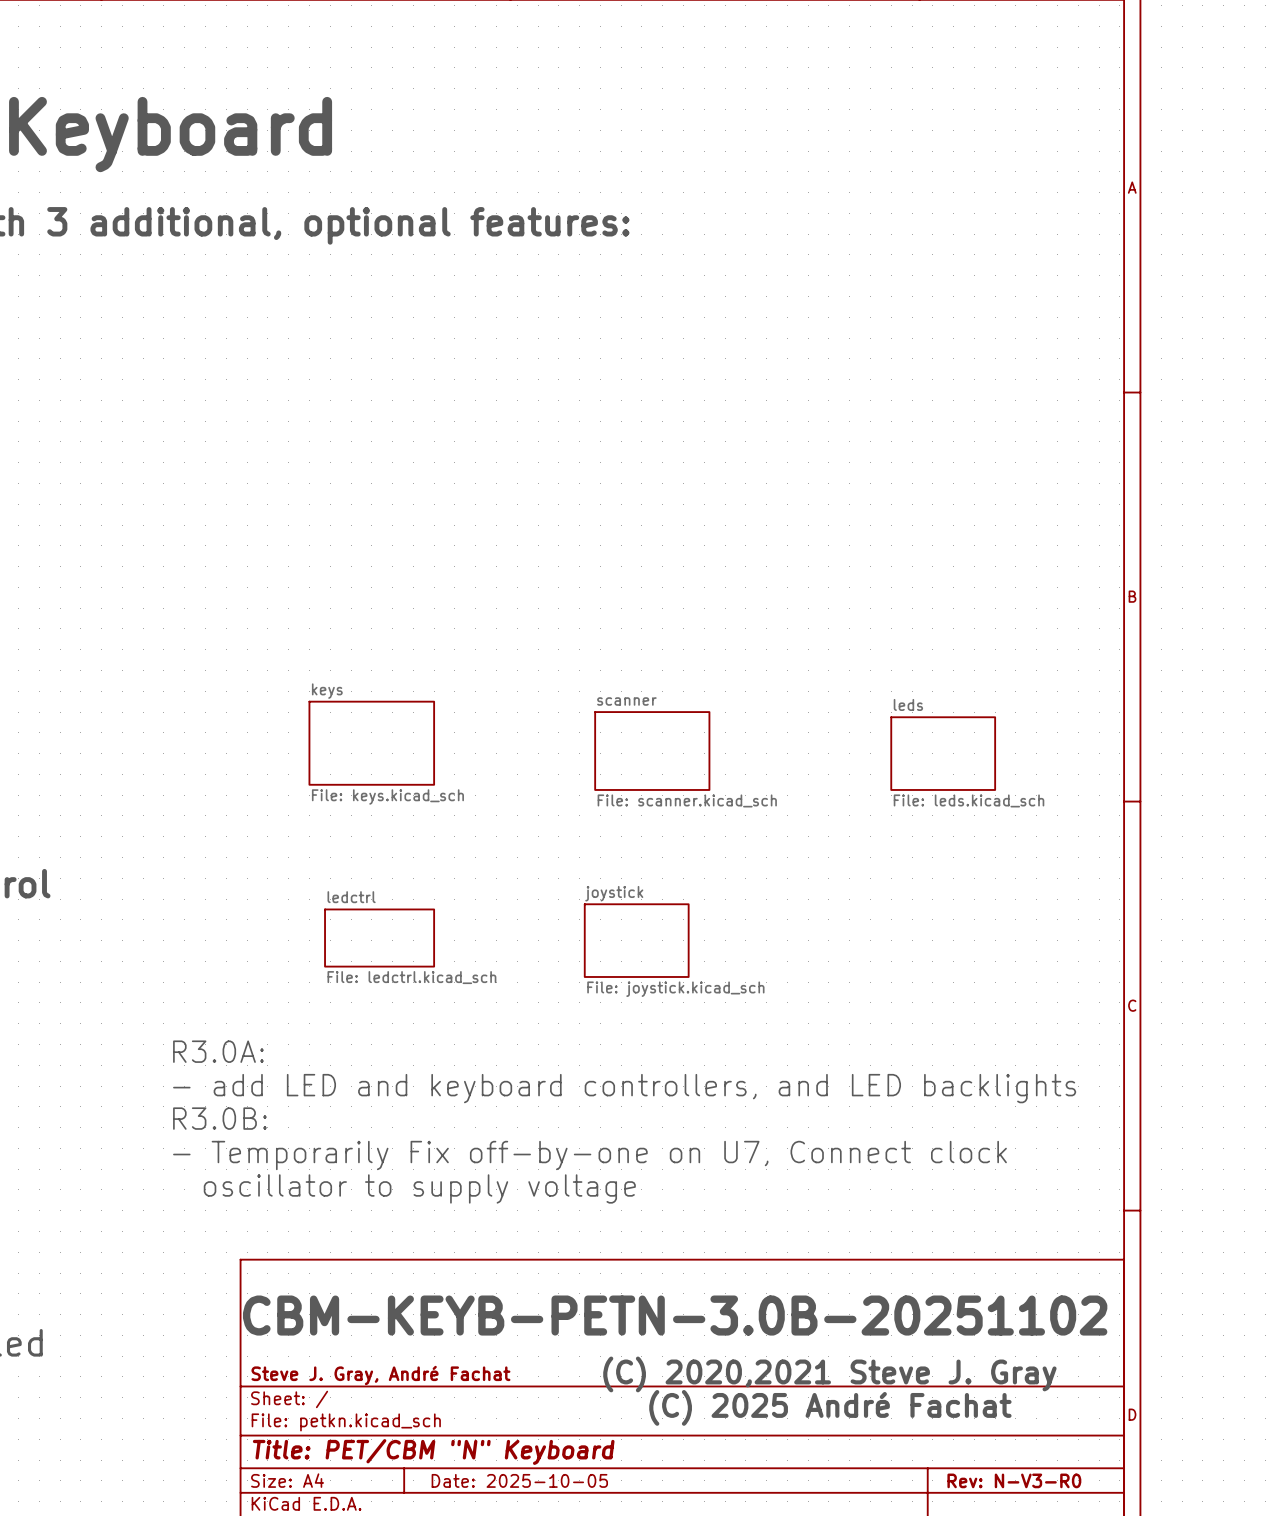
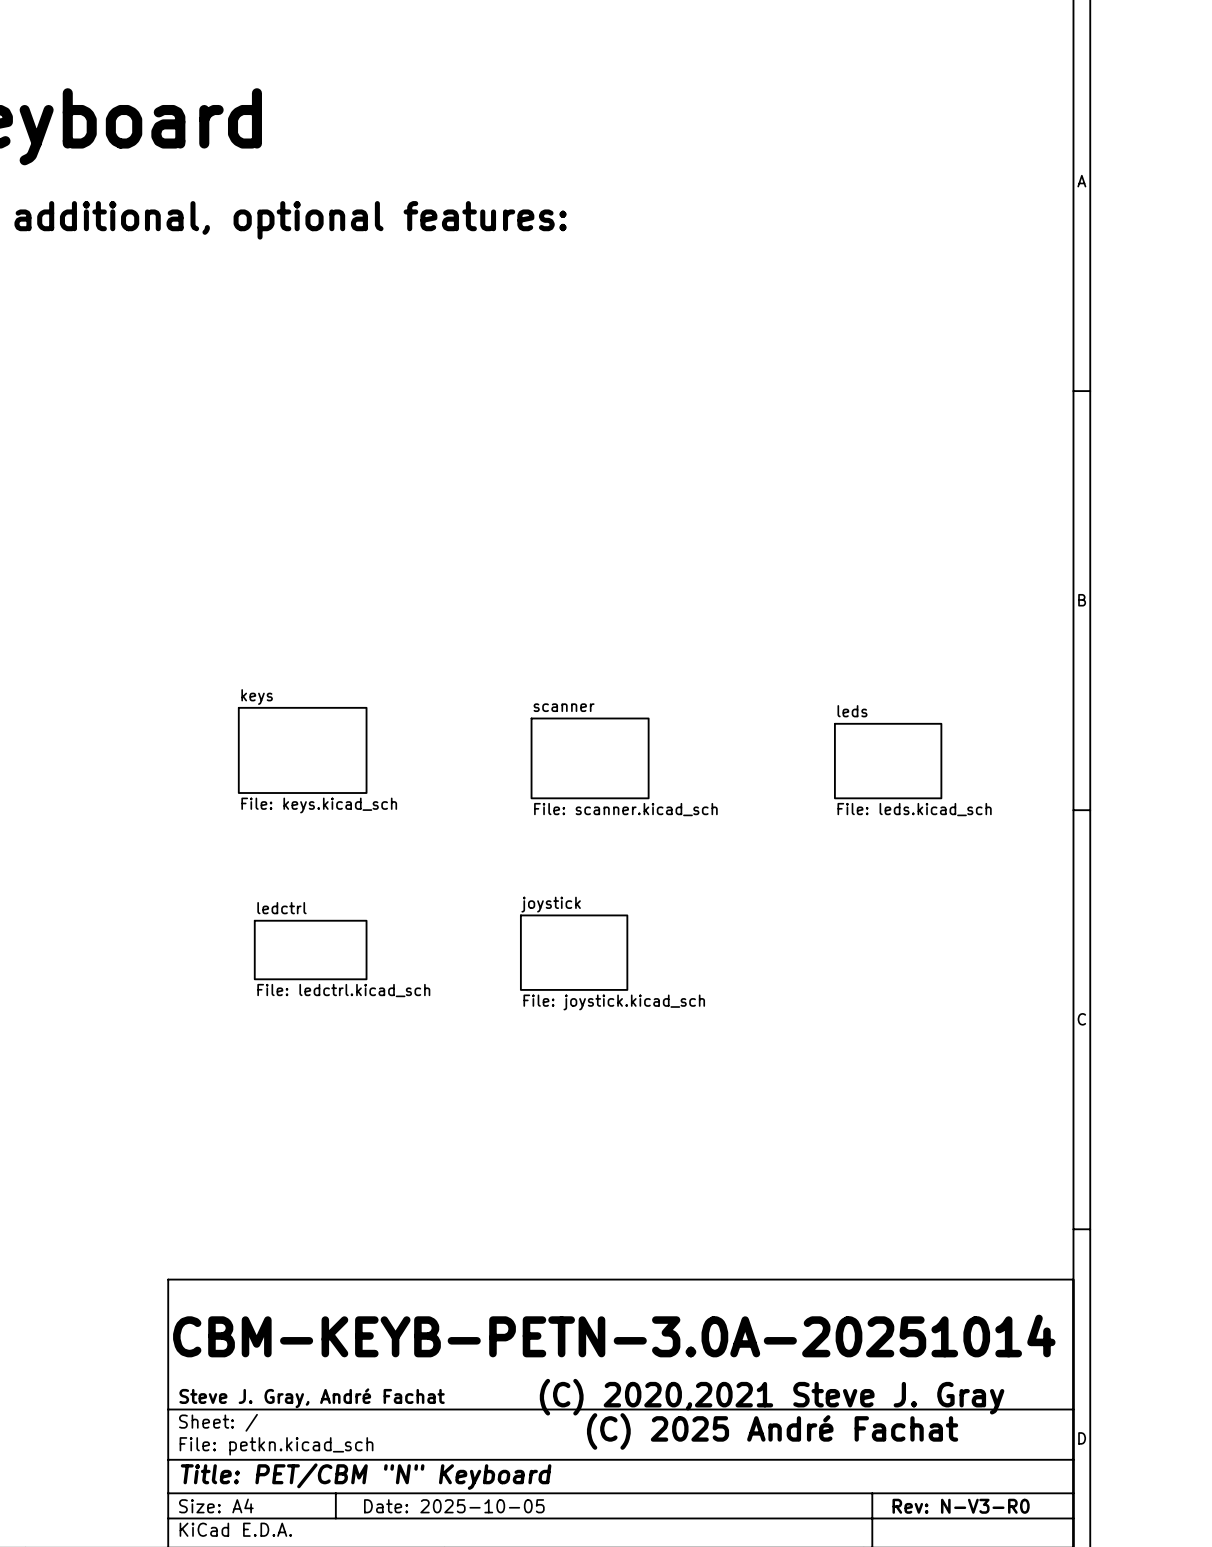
text: R3.0A: (218, 1051) -> none
text: - add LED and keyboard controllers, and LED backlights (624, 1088) -> none
text: R3.0B: (219, 1118) -> none
text: - Temporarily Fix off-by-one on U7, Connect clock (589, 1155) -> none
text: oscillator to supply voltage (419, 1188) -> none
text: CBM-KEYB-PETN-3.0B-20251102 (675, 1315) -> CBM-KEYB-PETN-3.0A-20251014 (614, 1336)

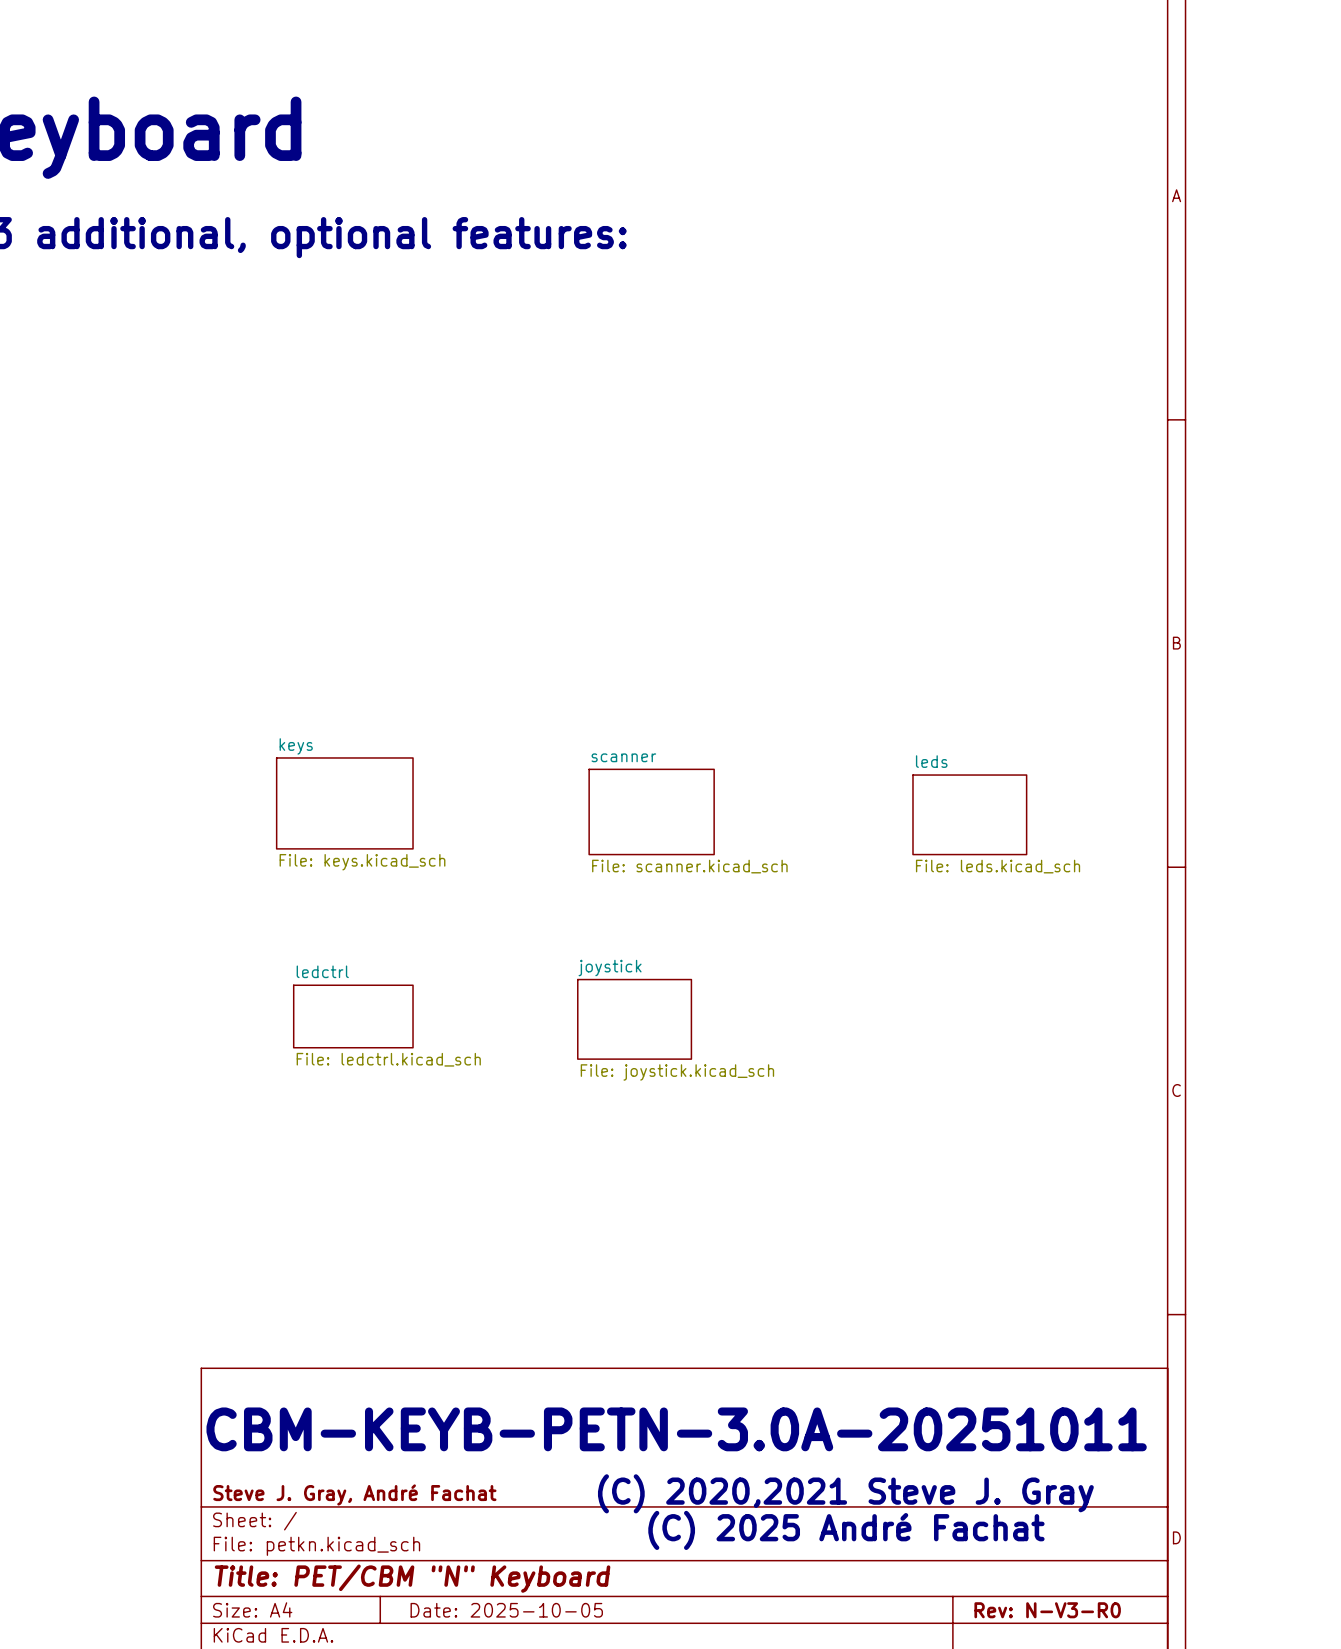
text: CBM-KEYB-PETN-3.0A-20251014 (614, 1336) -> CBM-KEYB-PETN-3.0A-20251011 (676, 1429)

